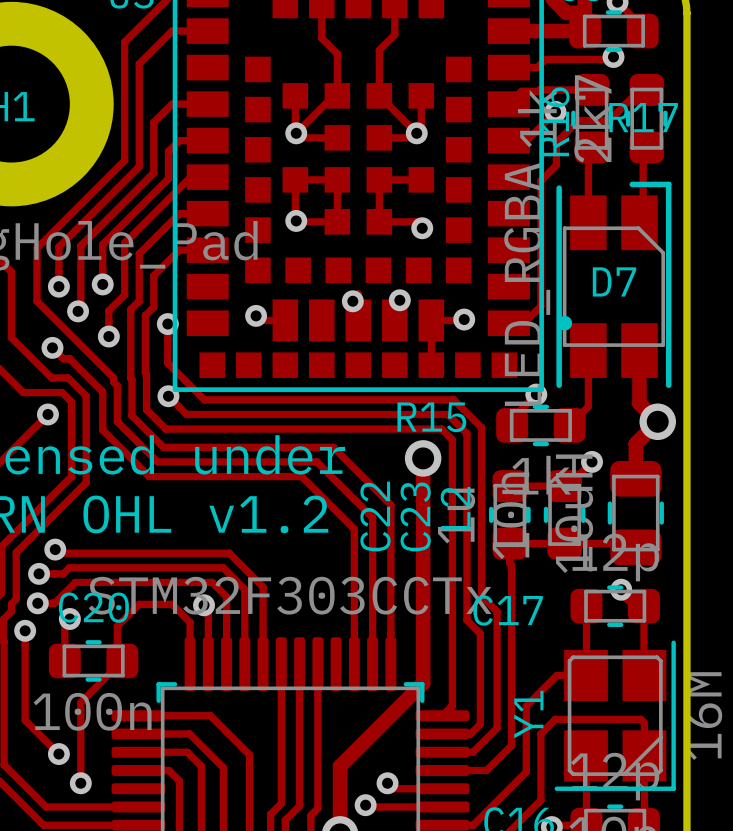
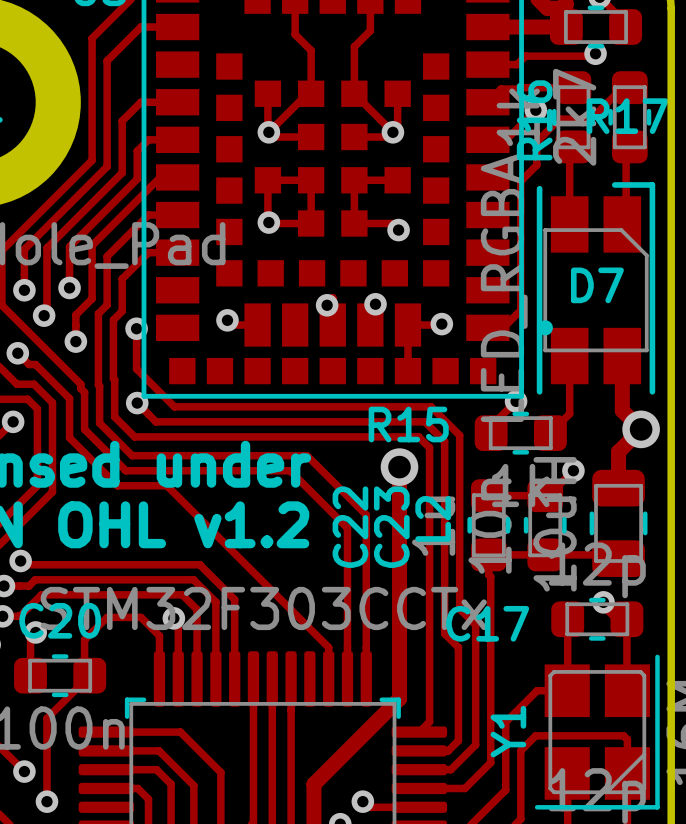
track: (197, 476) (301, 476) (354, 529) (354, 633) -> (167, 485) (328, 647)

